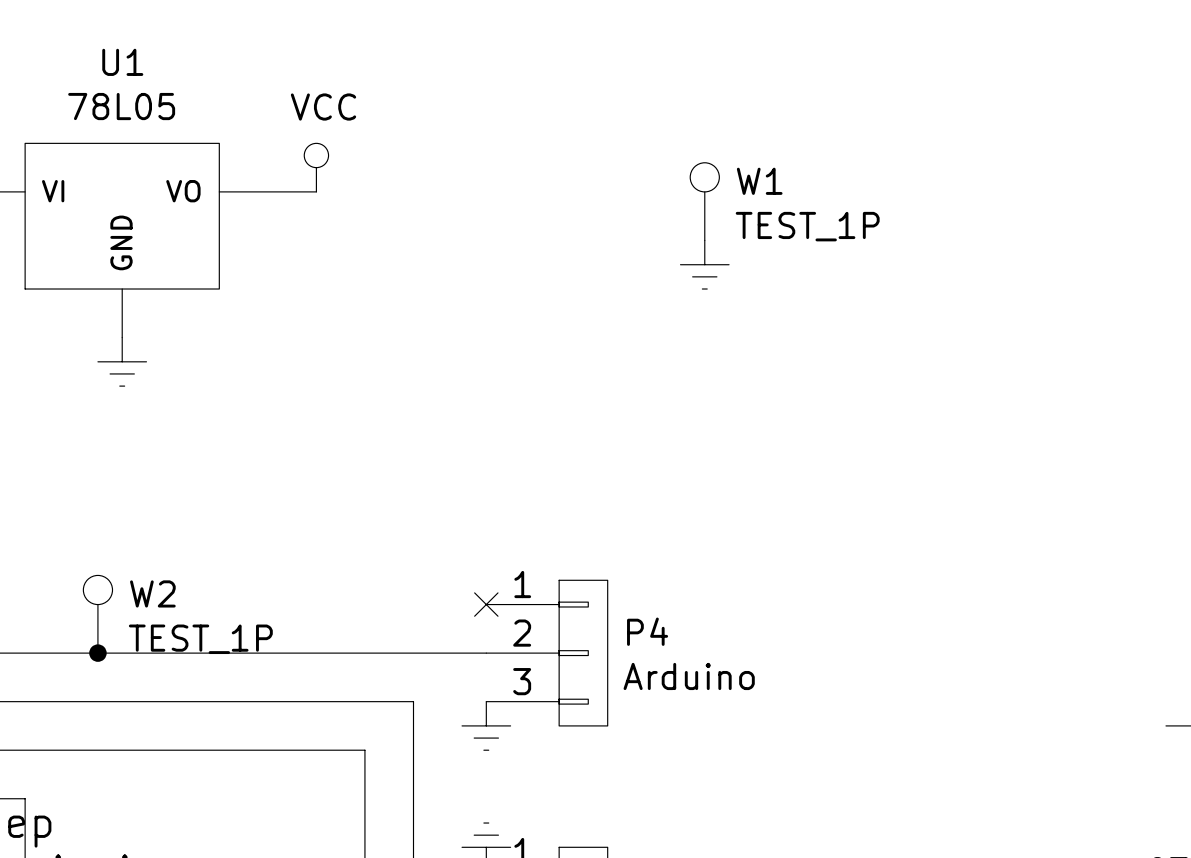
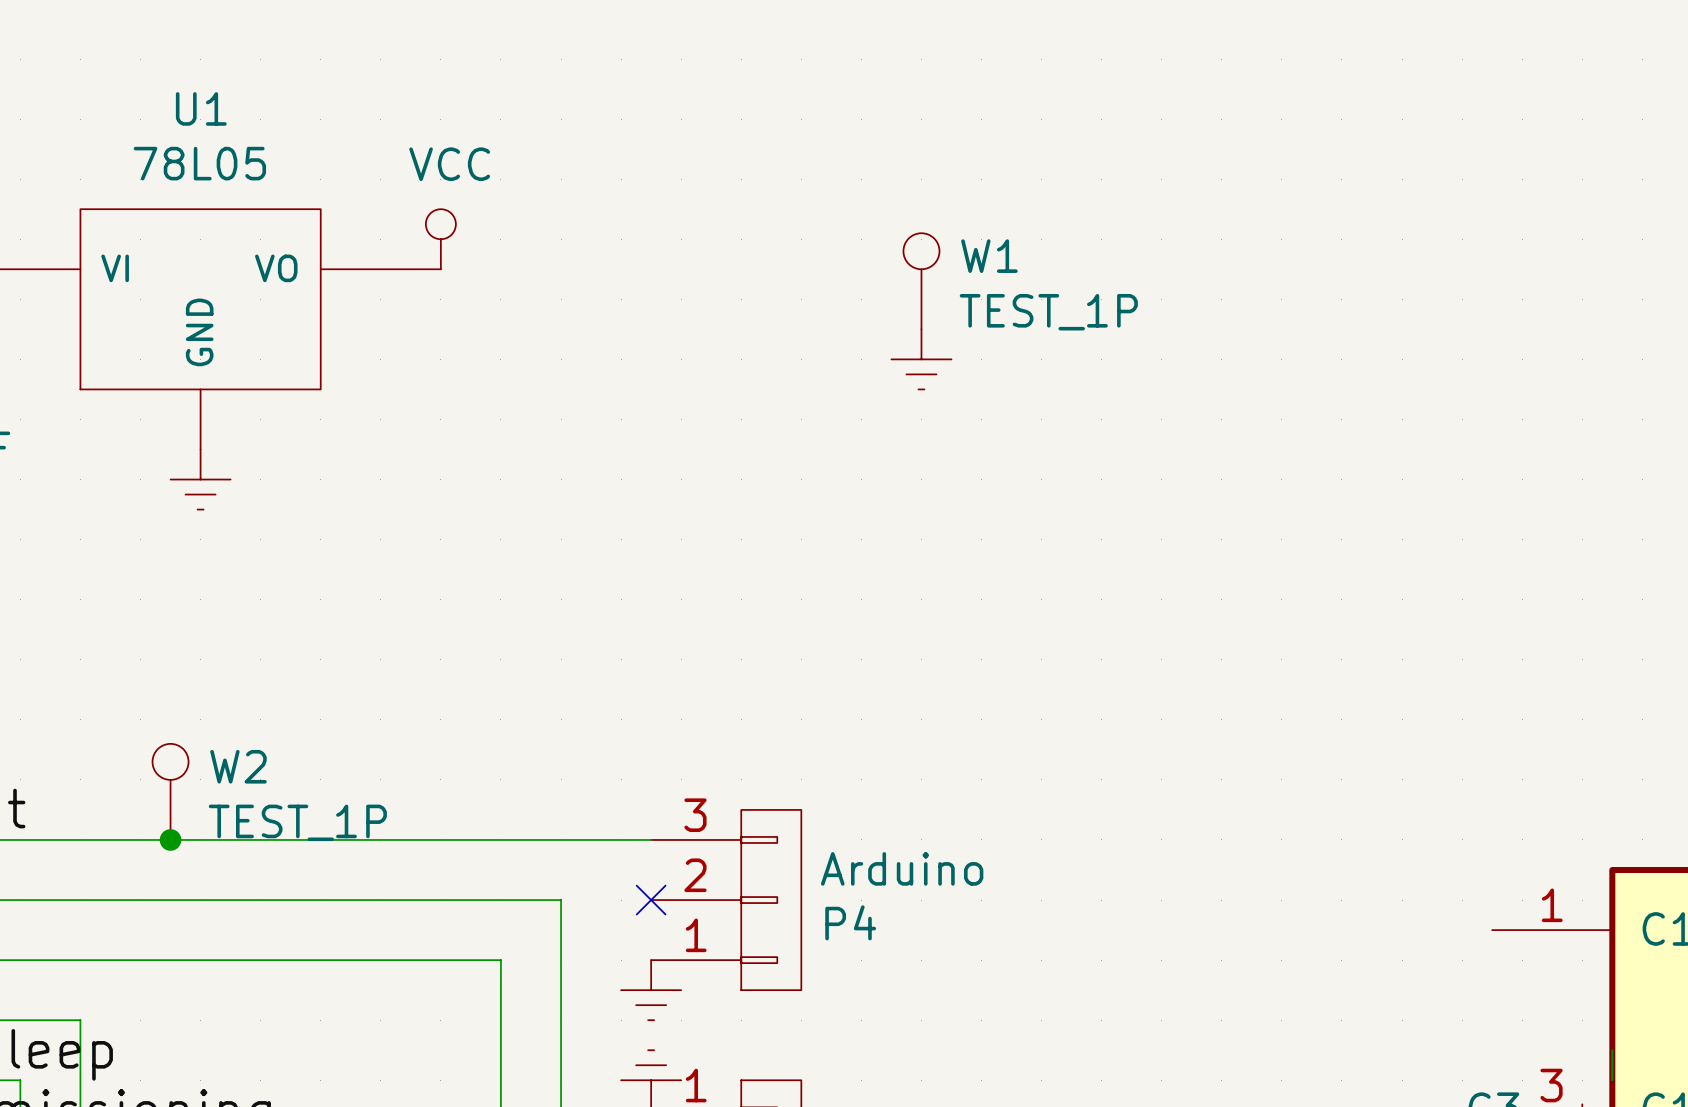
no-connect mark position: (486, 604) -> (651, 900)
P4 flip: as is (583, 653) -> up-down (771, 900)
power symbol position: (486, 725) -> (651, 990)

